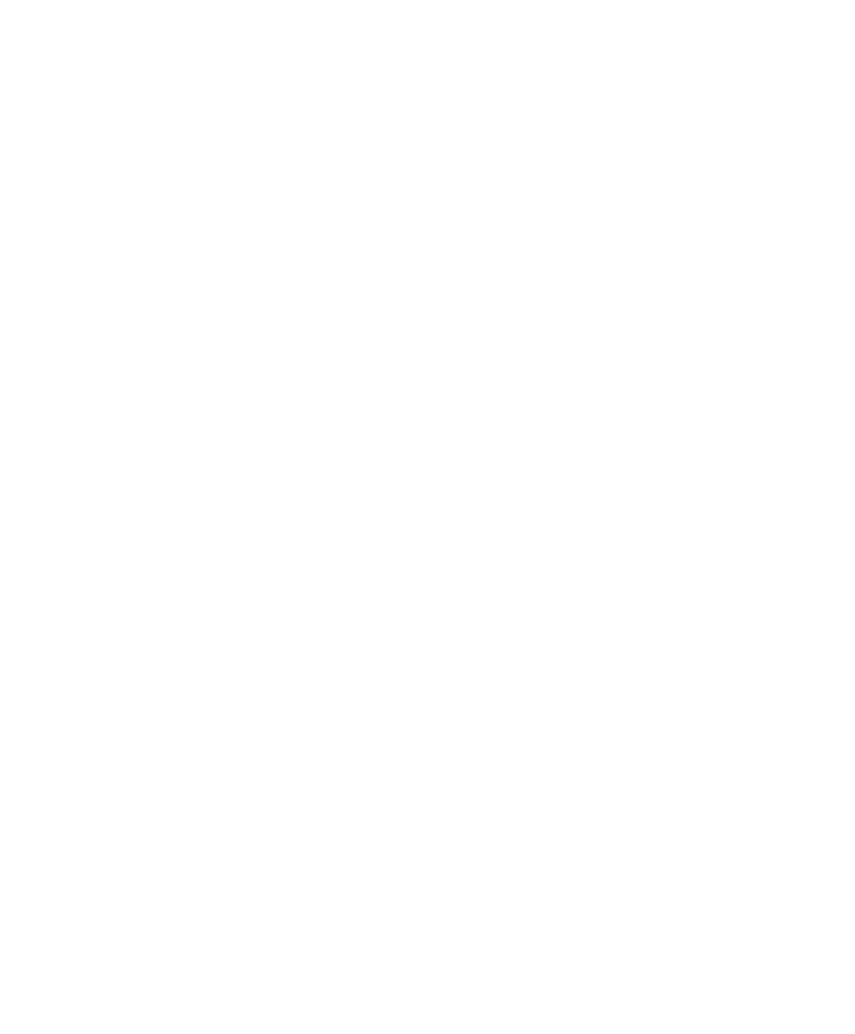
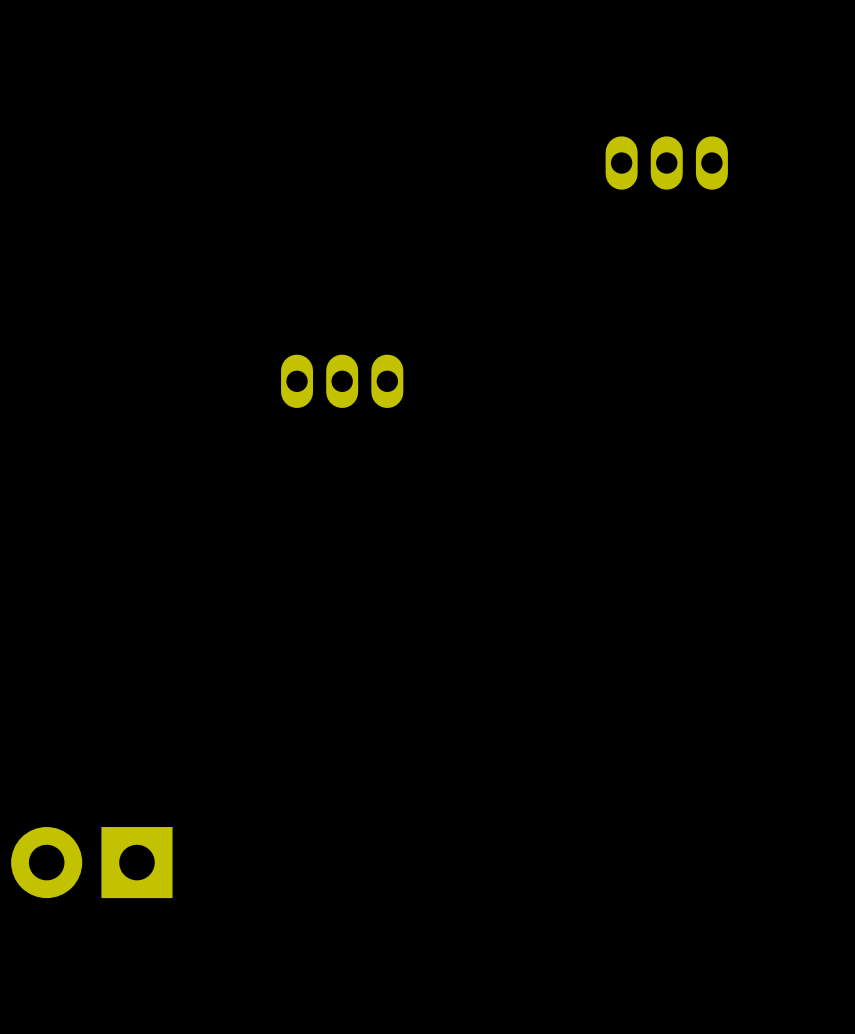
part: none -> (666, 163)
part: none -> (342, 381)
part: none -> (91, 862)

